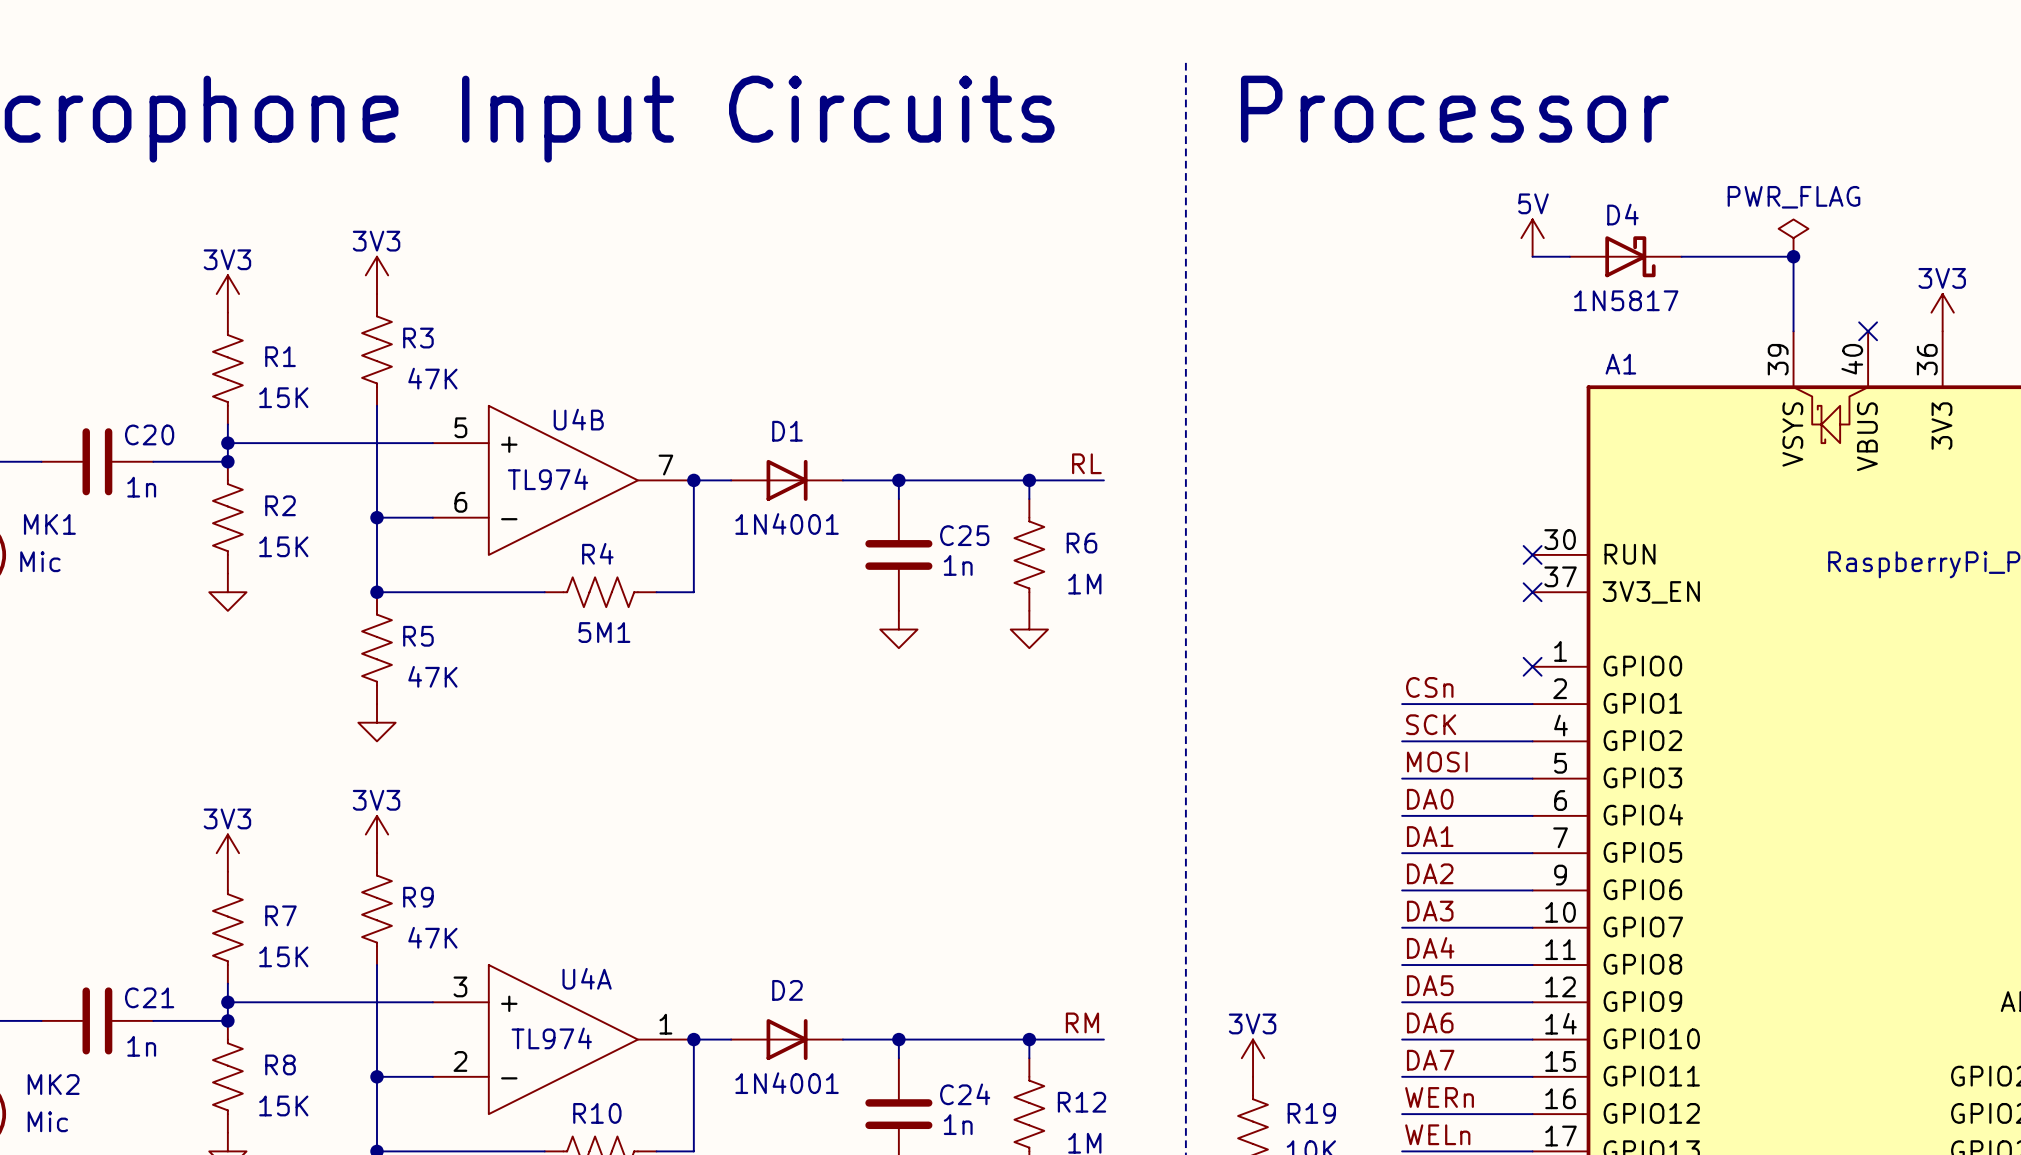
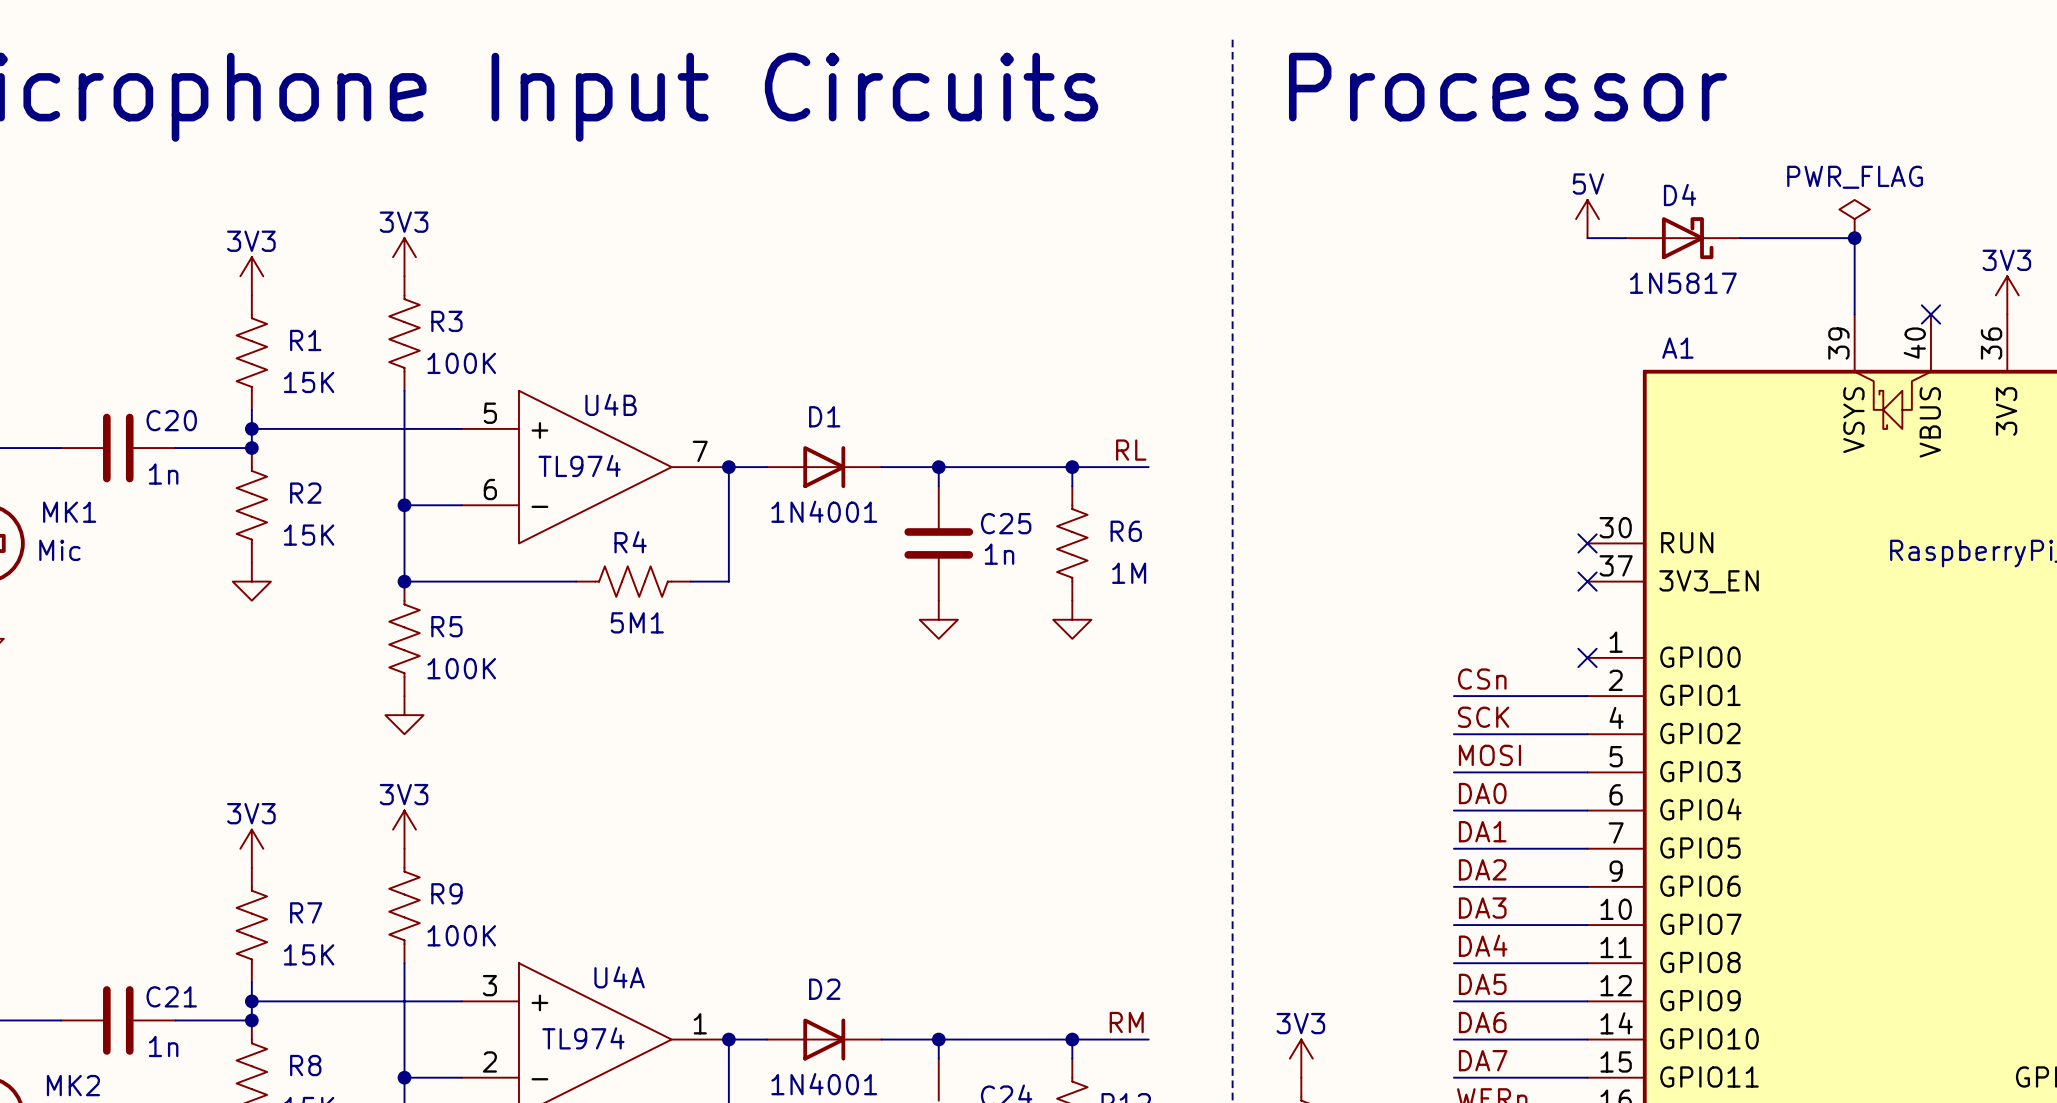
R3 value: 47K (432, 378) -> 100K (461, 363)
R5 value: 47K (432, 676) -> 100K (461, 668)
R9 value: 47K (432, 937) -> 100K (461, 935)

